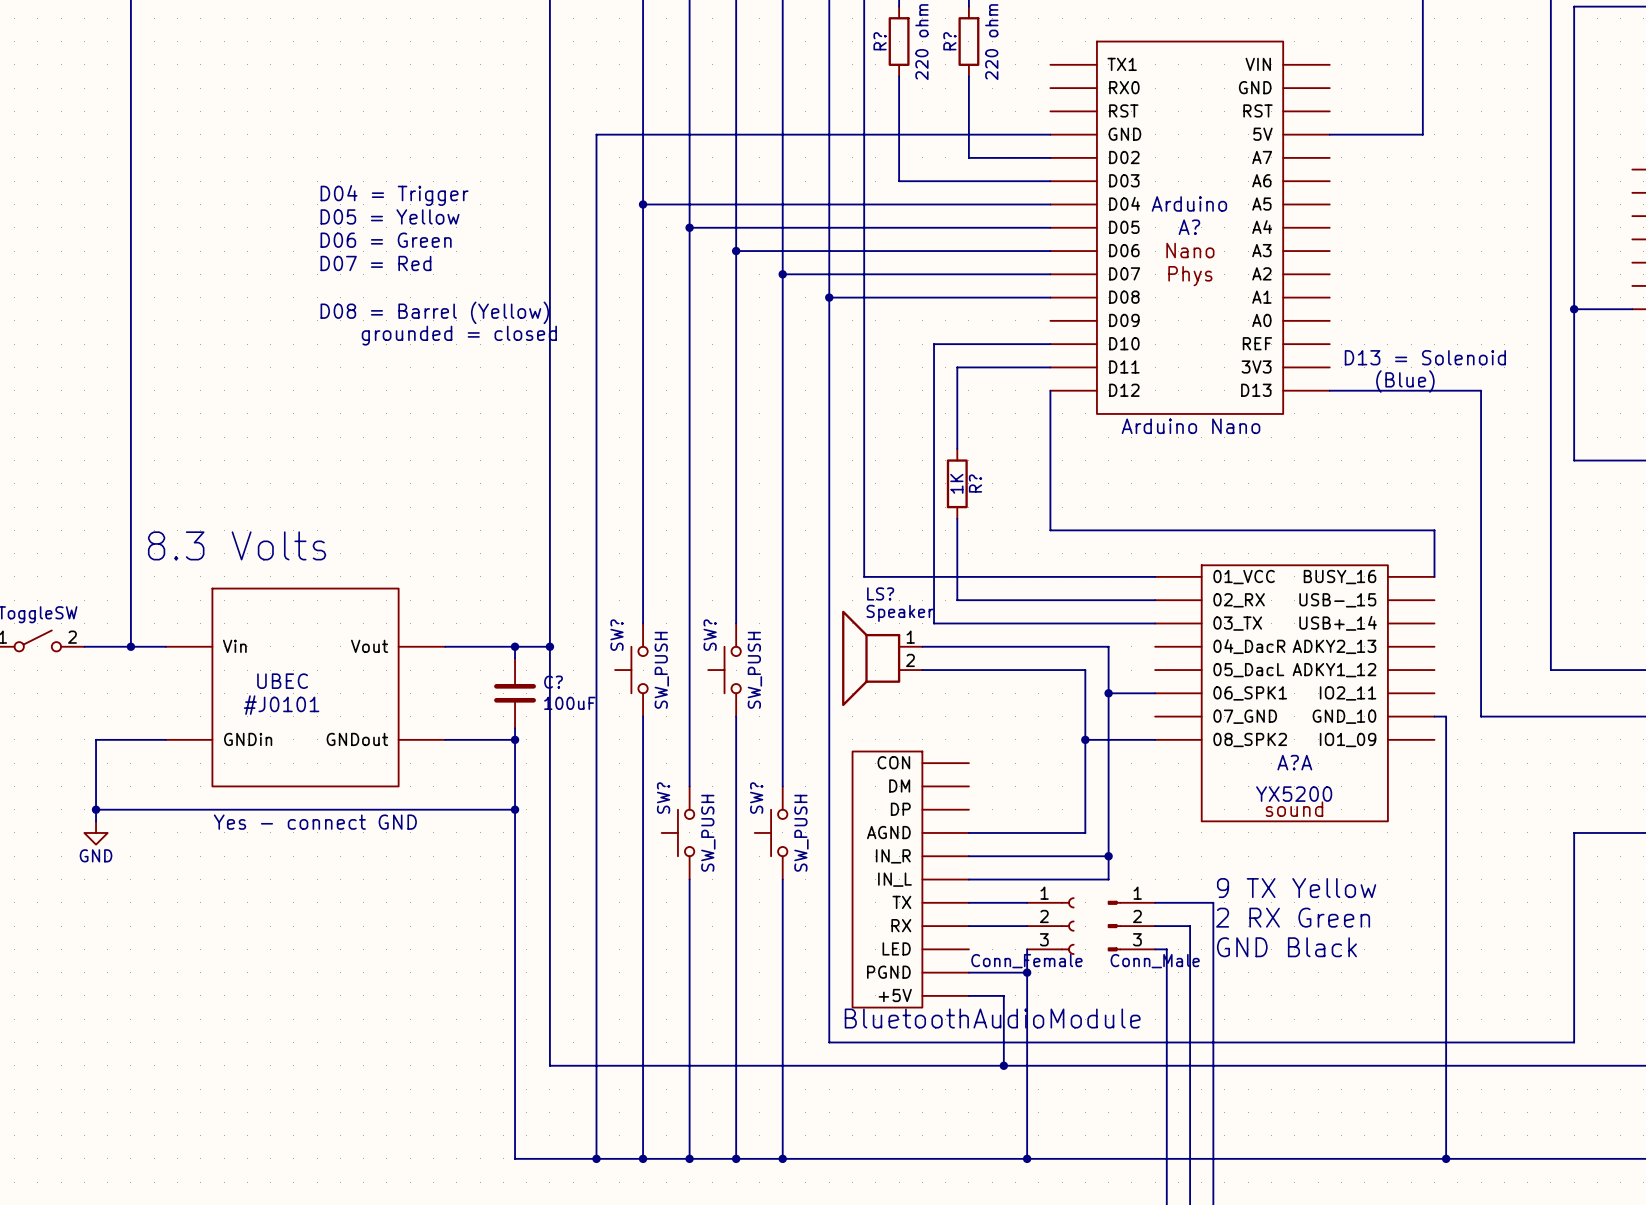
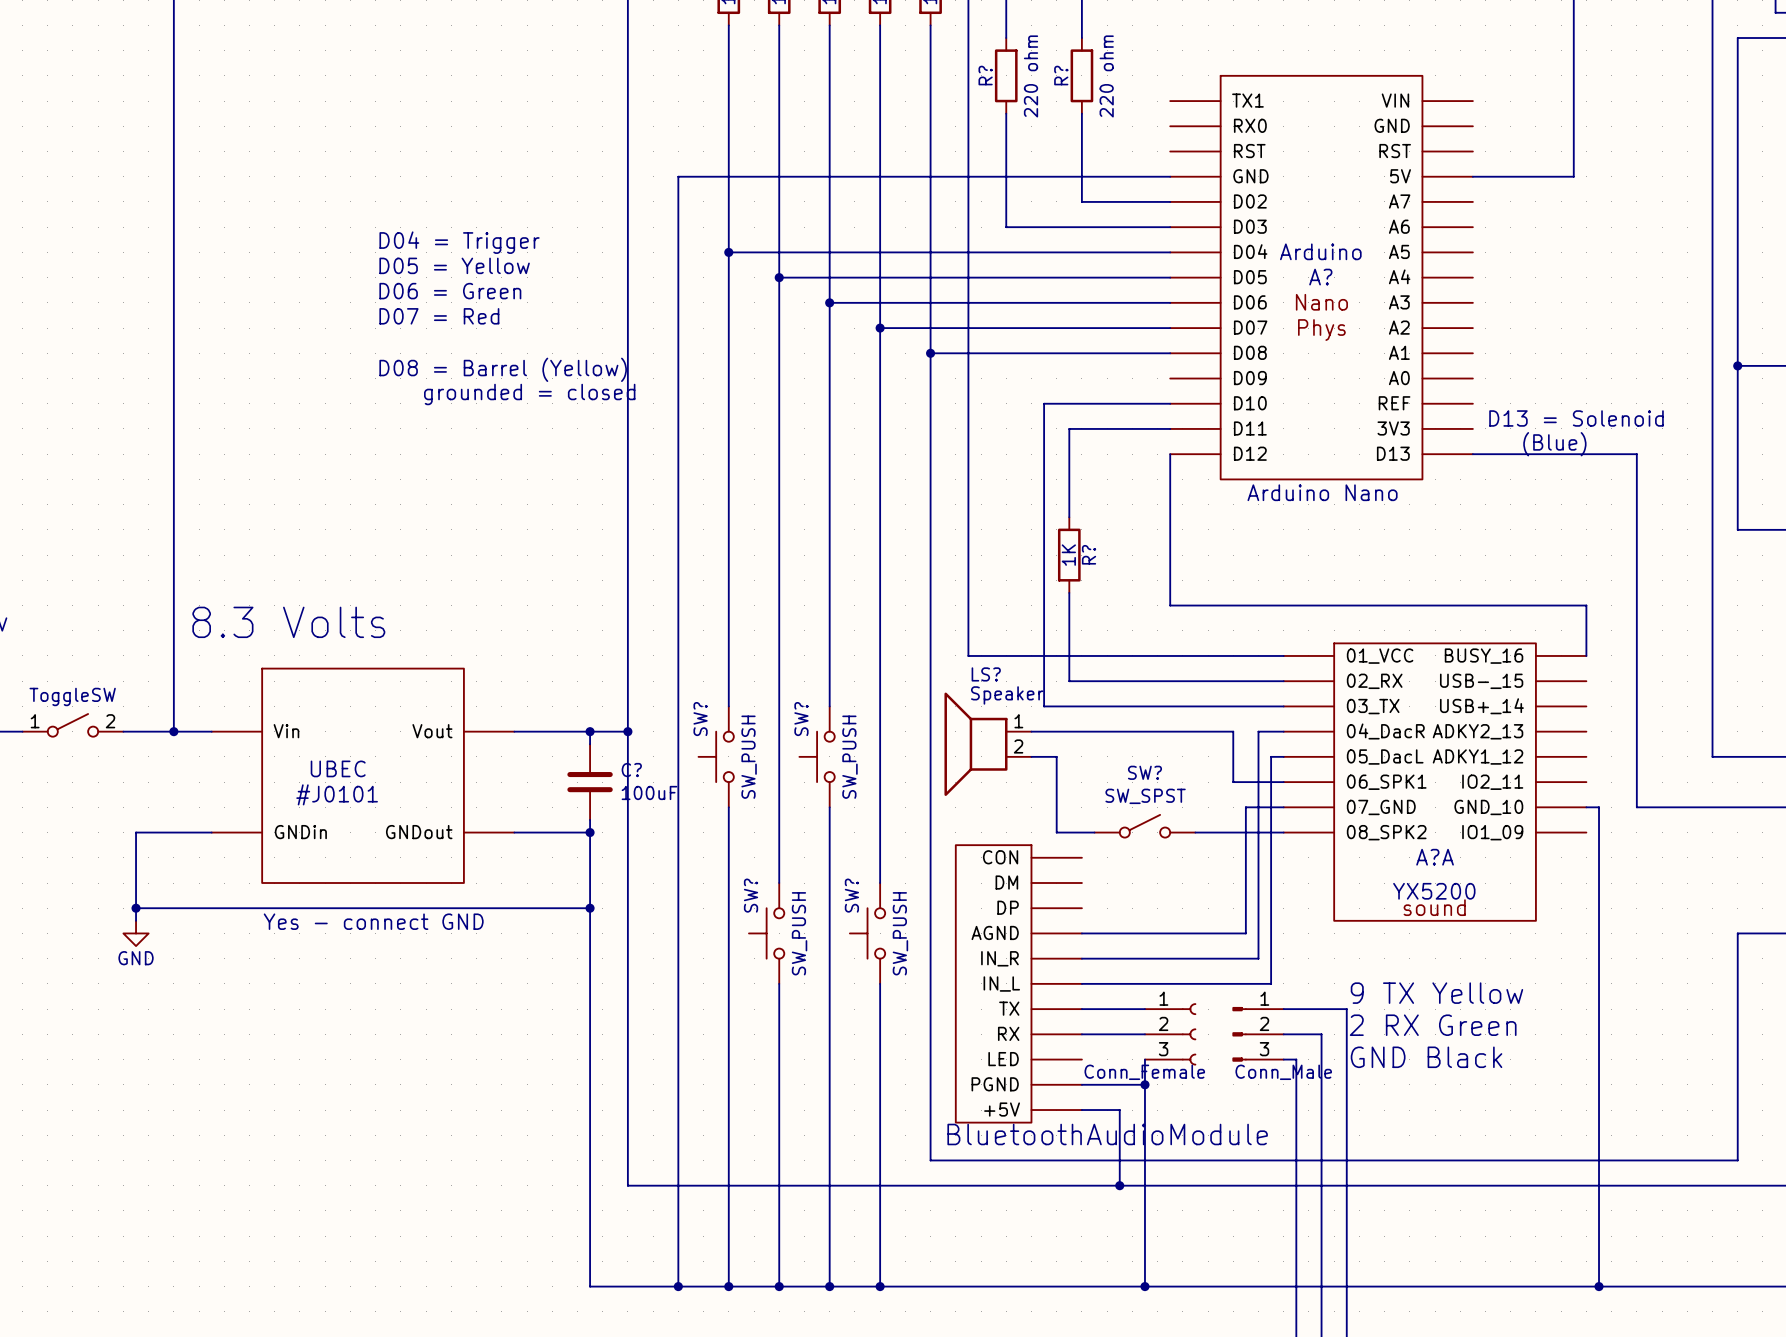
wire: none -> (1283, 731) (1258, 731) (1258, 958) (1233, 958)
wire: (945, 670) (1085, 670) (1085, 832) -> (1056, 756) (1056, 832) (1094, 832)
wire: (1108, 693) (1108, 879) -> (1283, 756) (1271, 756) (1271, 983) (1233, 983)
junction: (1108, 693) -> none
wire: none -> (1283, 807) (1245, 807) (1245, 933) (1208, 933)
SW?: none -> SW_SPST (1144, 826)
wire: none -> (1195, 832) (1208, 832)
junction: (1085, 739) -> none
junction: (1108, 856) -> none

